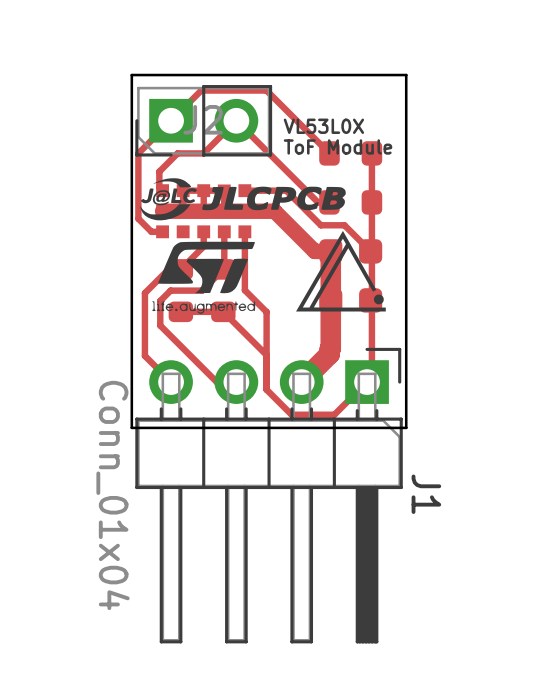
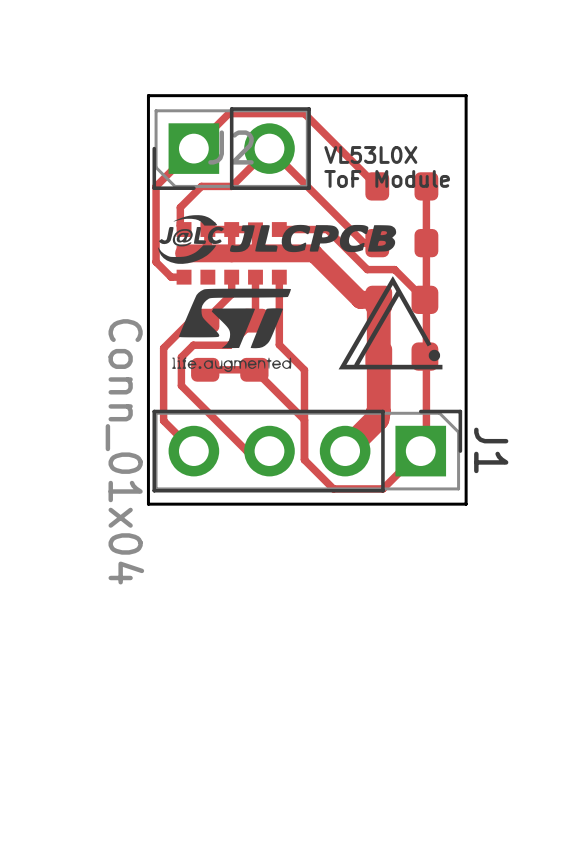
J1 footprint: [135, 347, 403, 644] -> [152, 409, 463, 493]

